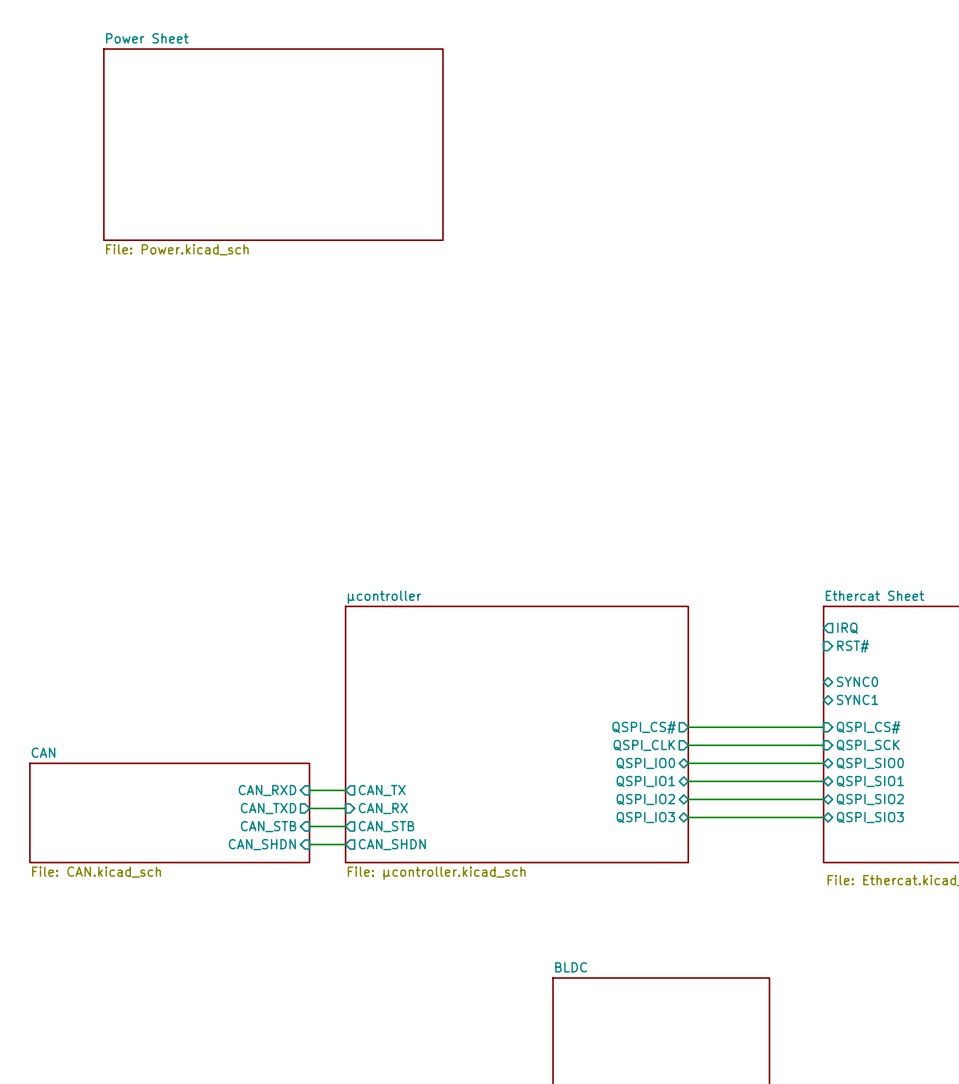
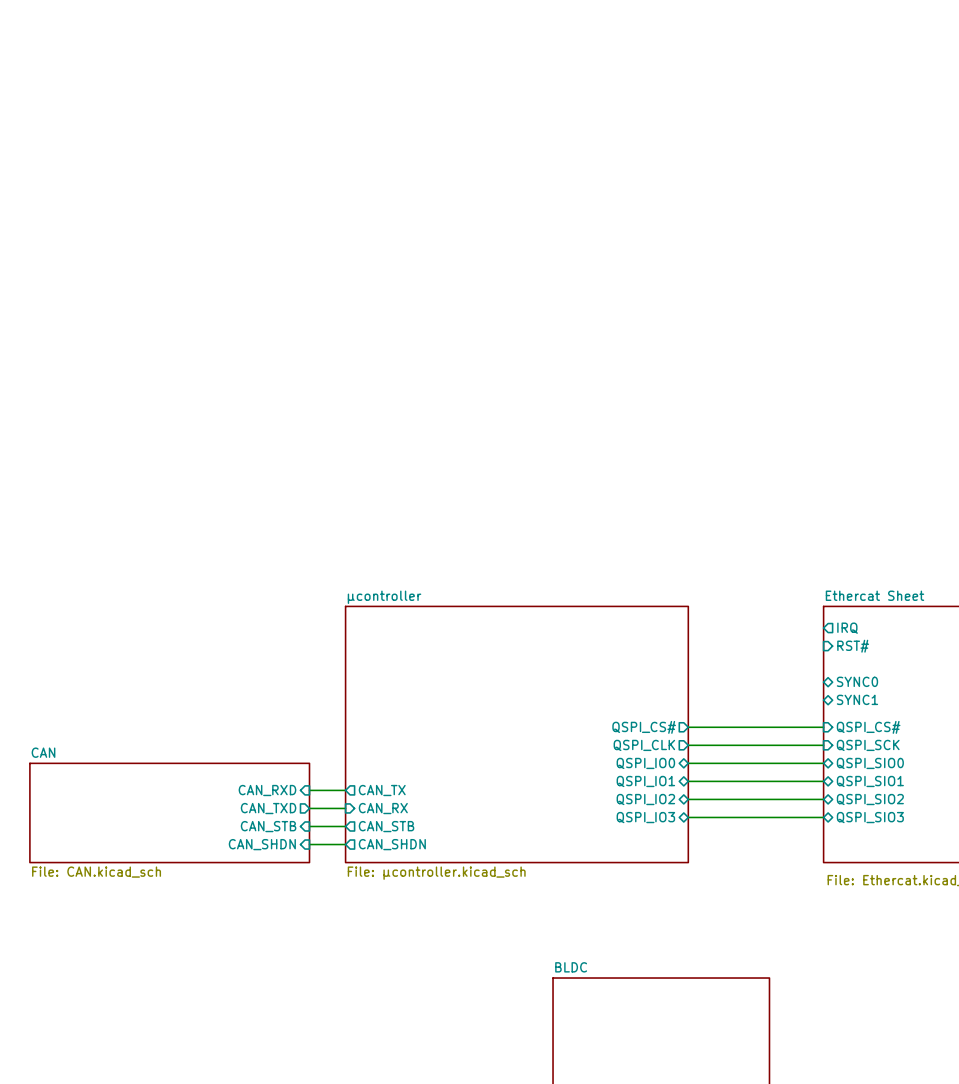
sheet Power Sheet: File: Power.kicad_sch (273, 144) -> none

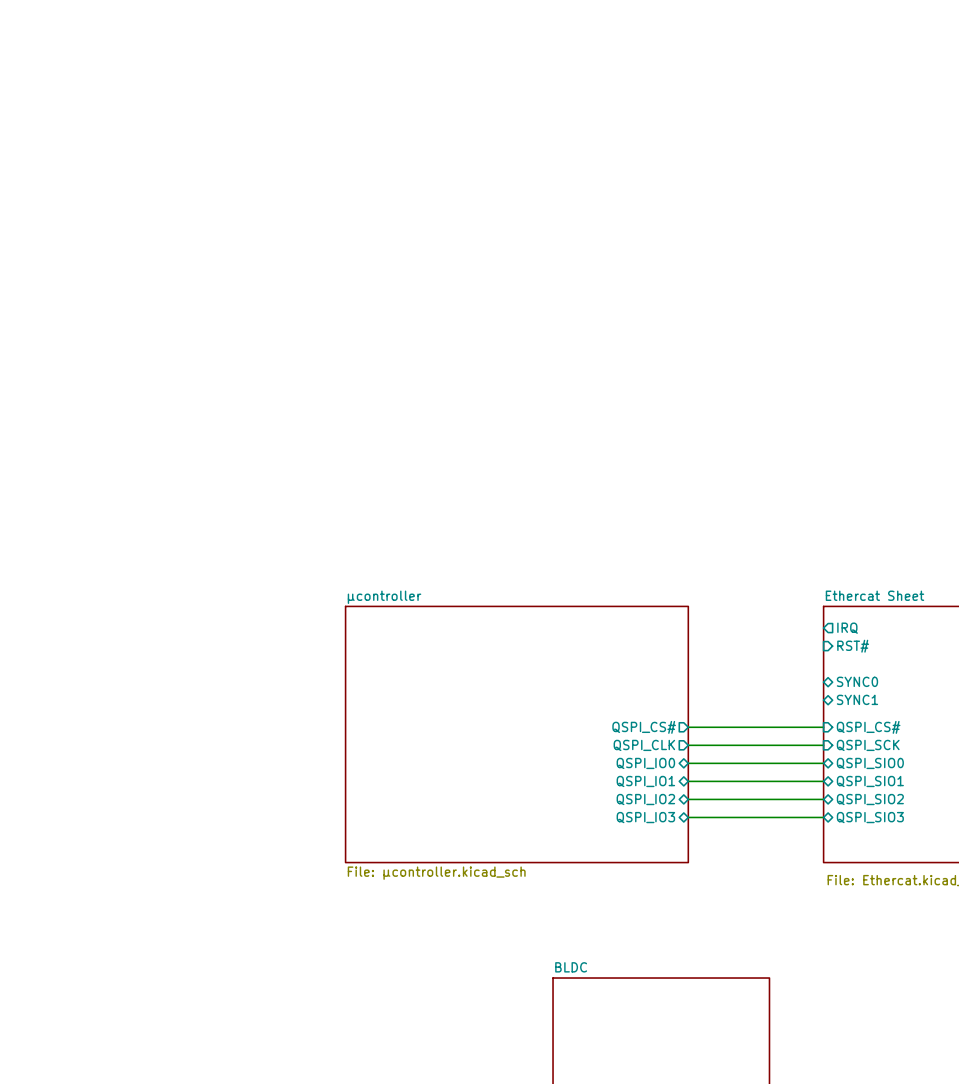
sheet pin: CAN_RXD (267, 790) -> none
wire: (309, 790) (345, 790) -> none
sheet pin: CAN_TX (382, 790) -> none
sheet pin: CAN_TXD (268, 808) -> none
wire: (309, 808) (345, 808) -> none
sheet pin: CAN_RX (383, 808) -> none
sheet CAN: File: CAN.kicad_sch (169, 812) -> none
sheet pin: CAN_STB (268, 826) -> none
wire: (309, 826) (345, 826) -> none
sheet pin: CAN_STB (386, 826) -> none
sheet pin: CAN_SHDN (262, 844) -> none
wire: (309, 844) (345, 844) -> none
sheet pin: CAN_SHDN (392, 844) -> none

